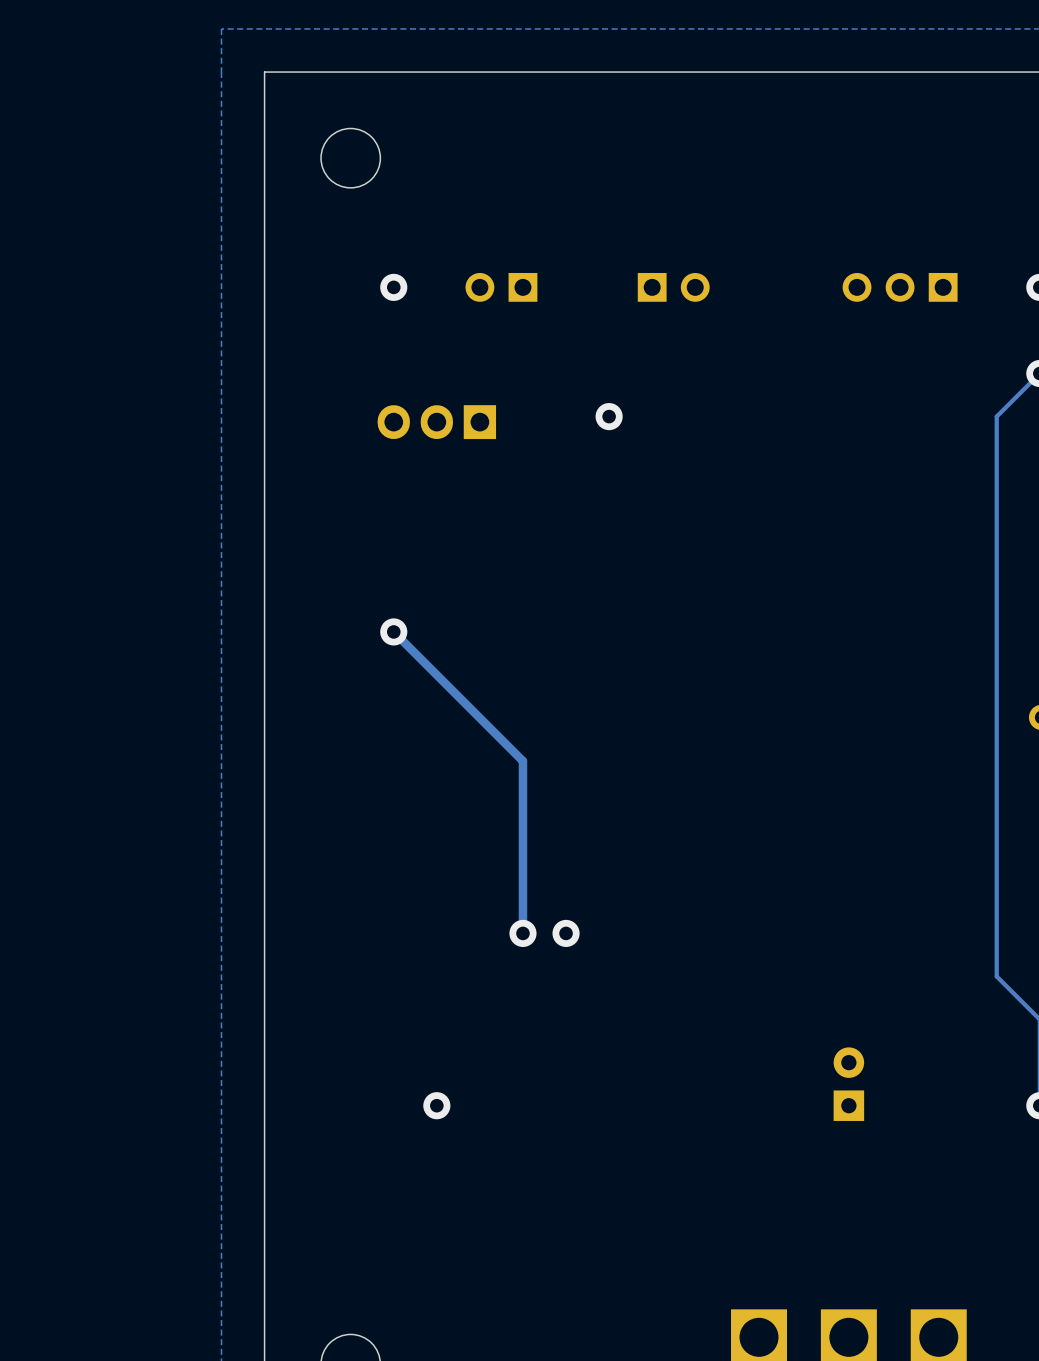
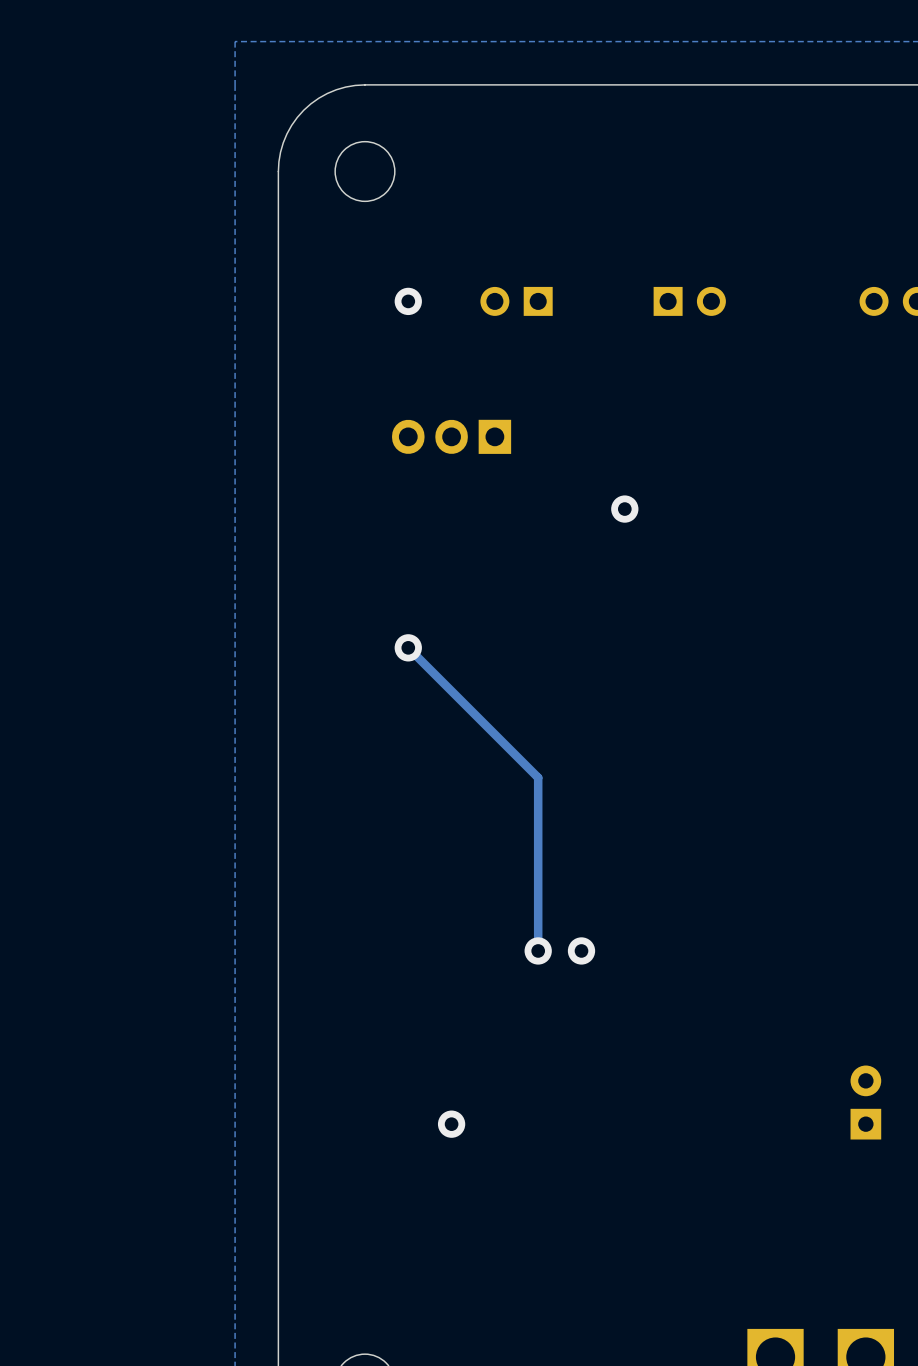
board edge: (350, 72) (264, 72) (264, 158) -> (364, 84) (345, 87) (327, 93) (303, 110) (286, 133) (280, 152) (278, 171)
via position: (609, 416) -> (624, 509)

